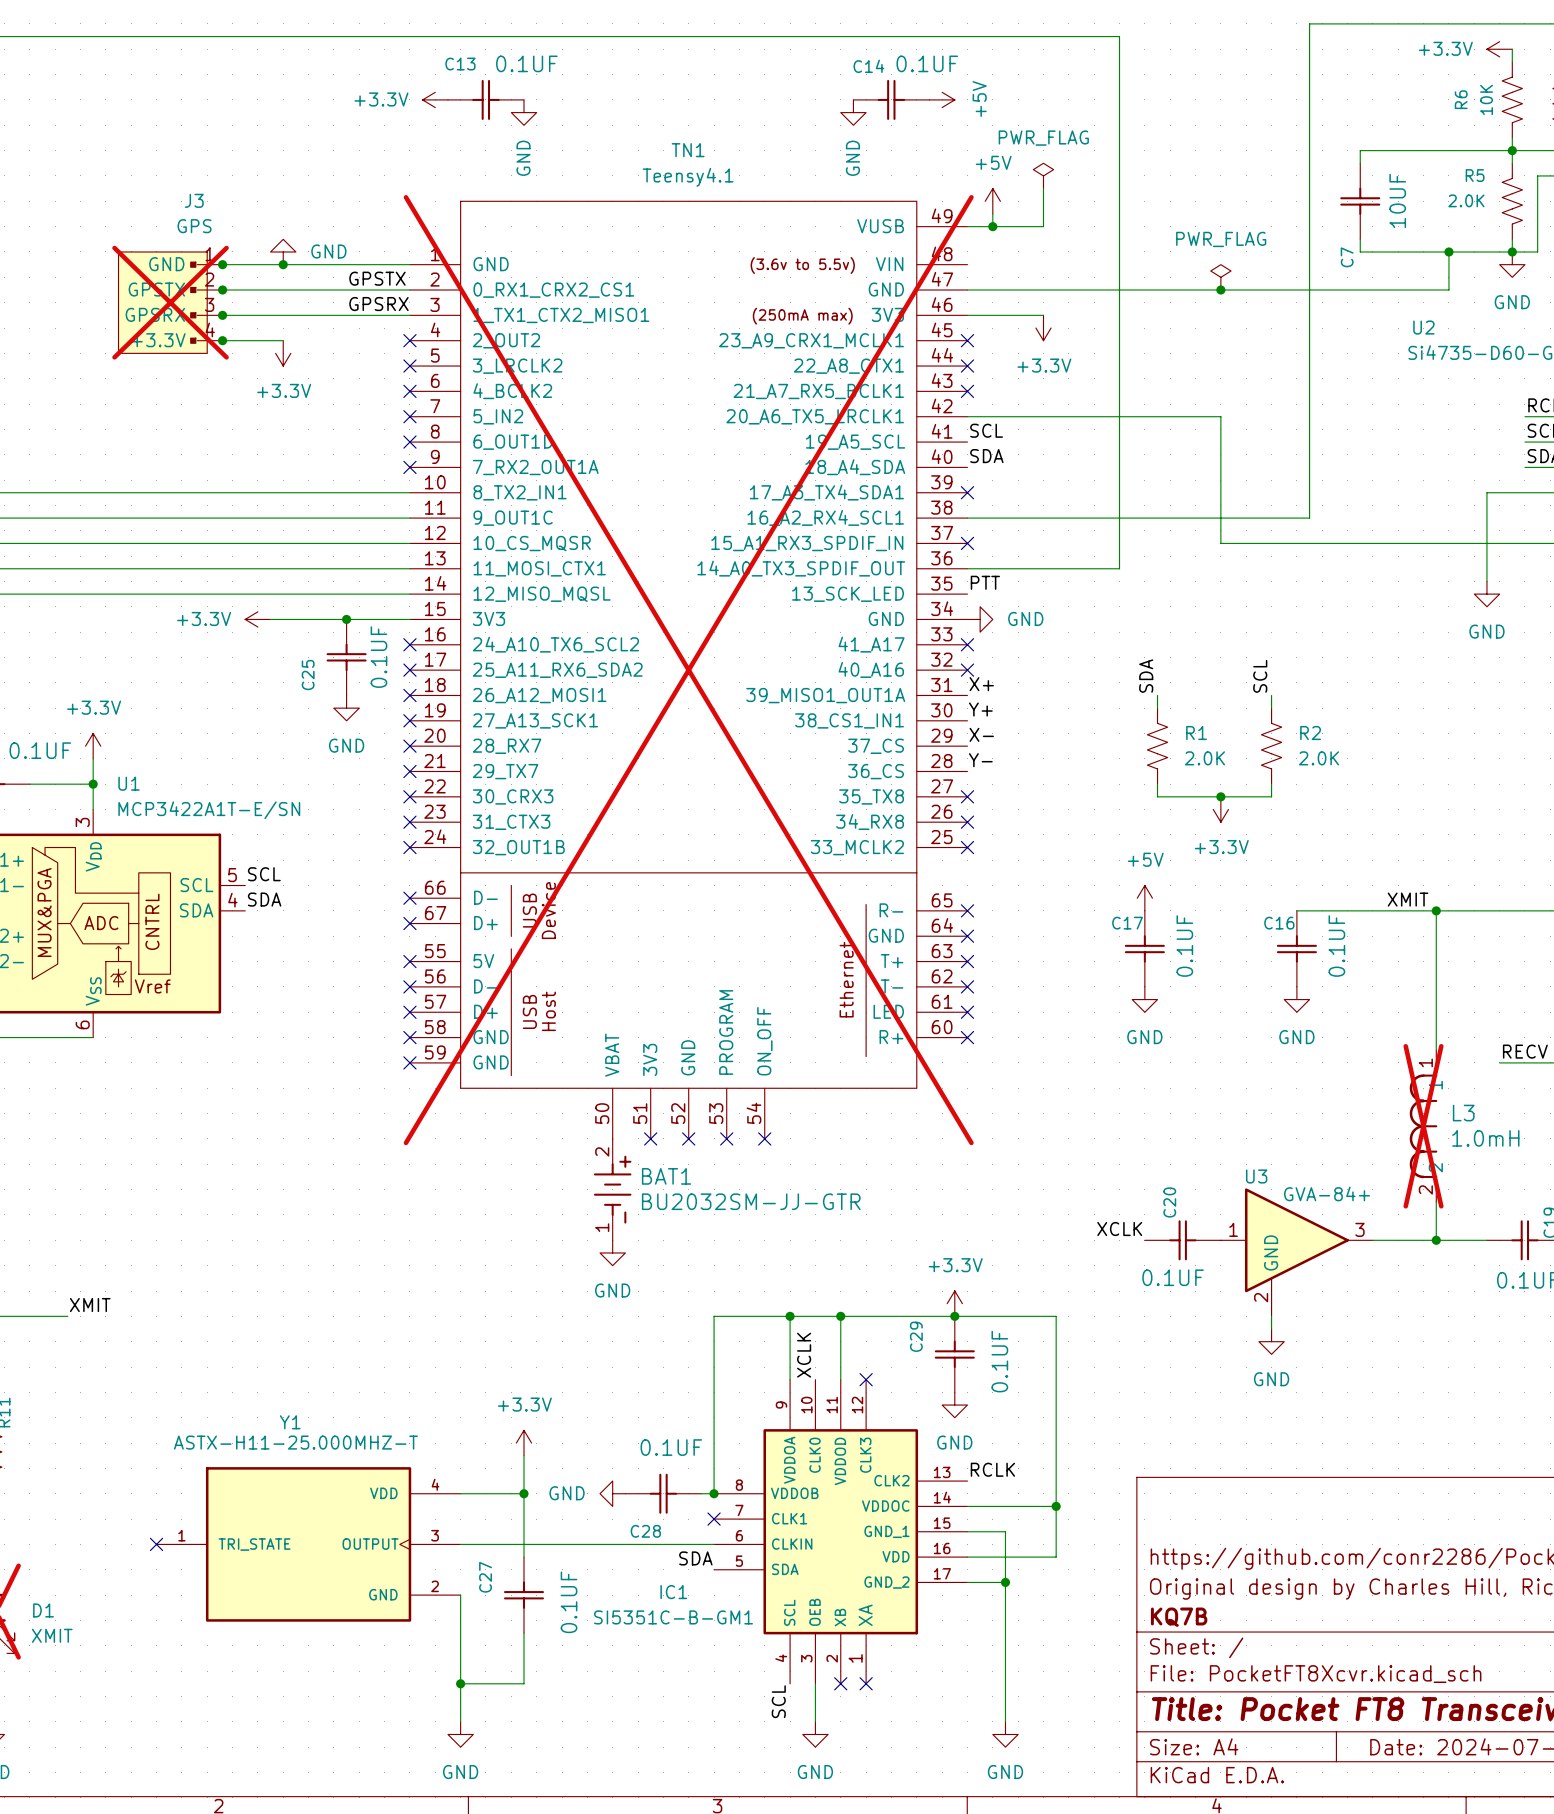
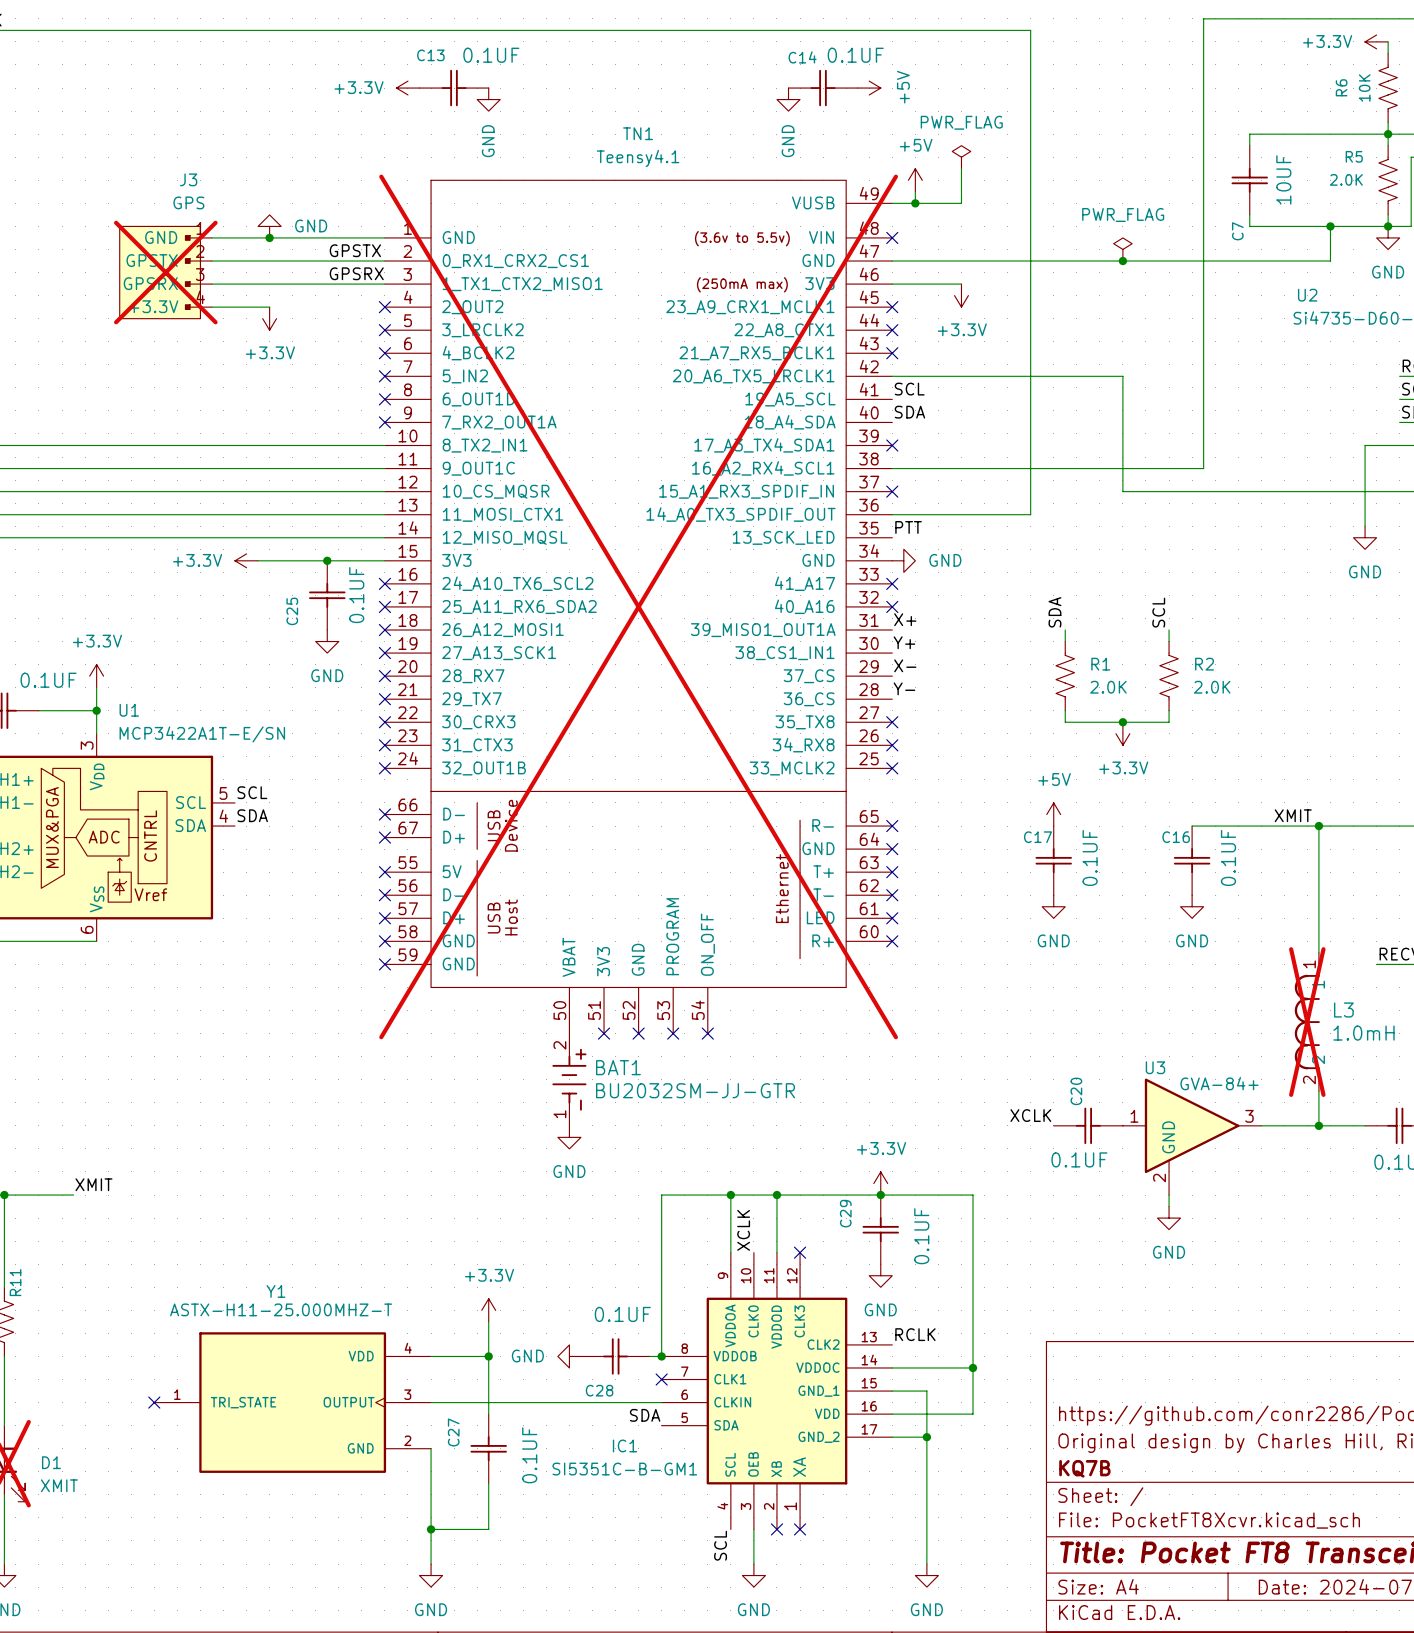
J3 symbol: [118, 251, 223, 354] -> [119, 226, 212, 319]
junction: (222, 264) -> none
no-connect mark: none -> (892, 237)
junction: (222, 290) -> none
junction: (222, 315) -> none
junction: (222, 340) -> none

